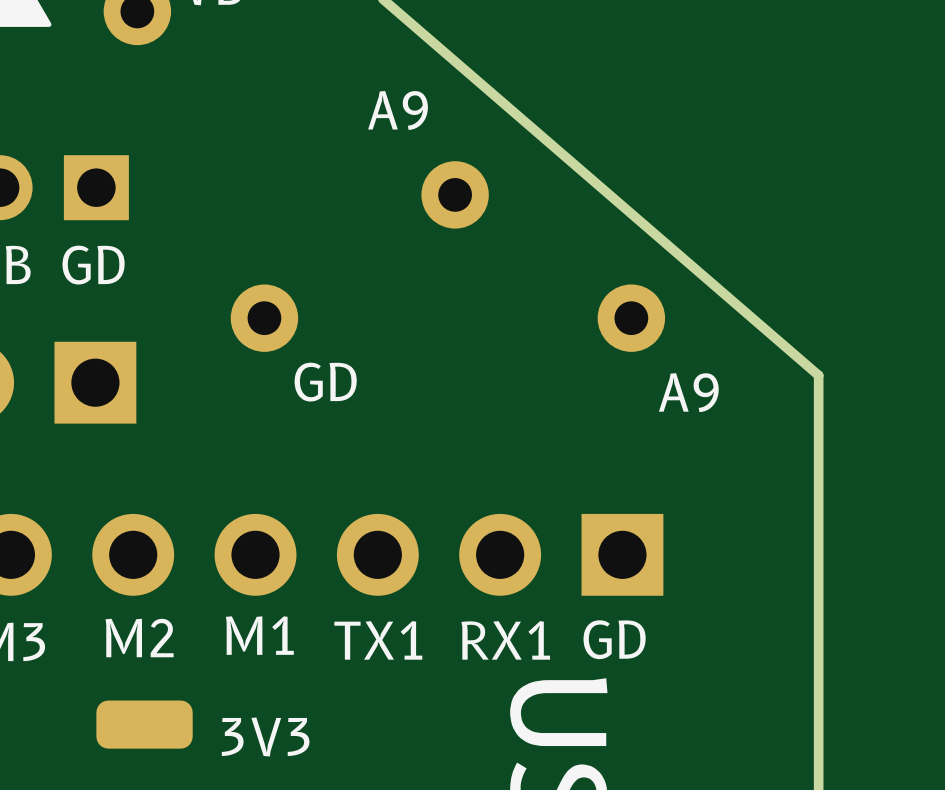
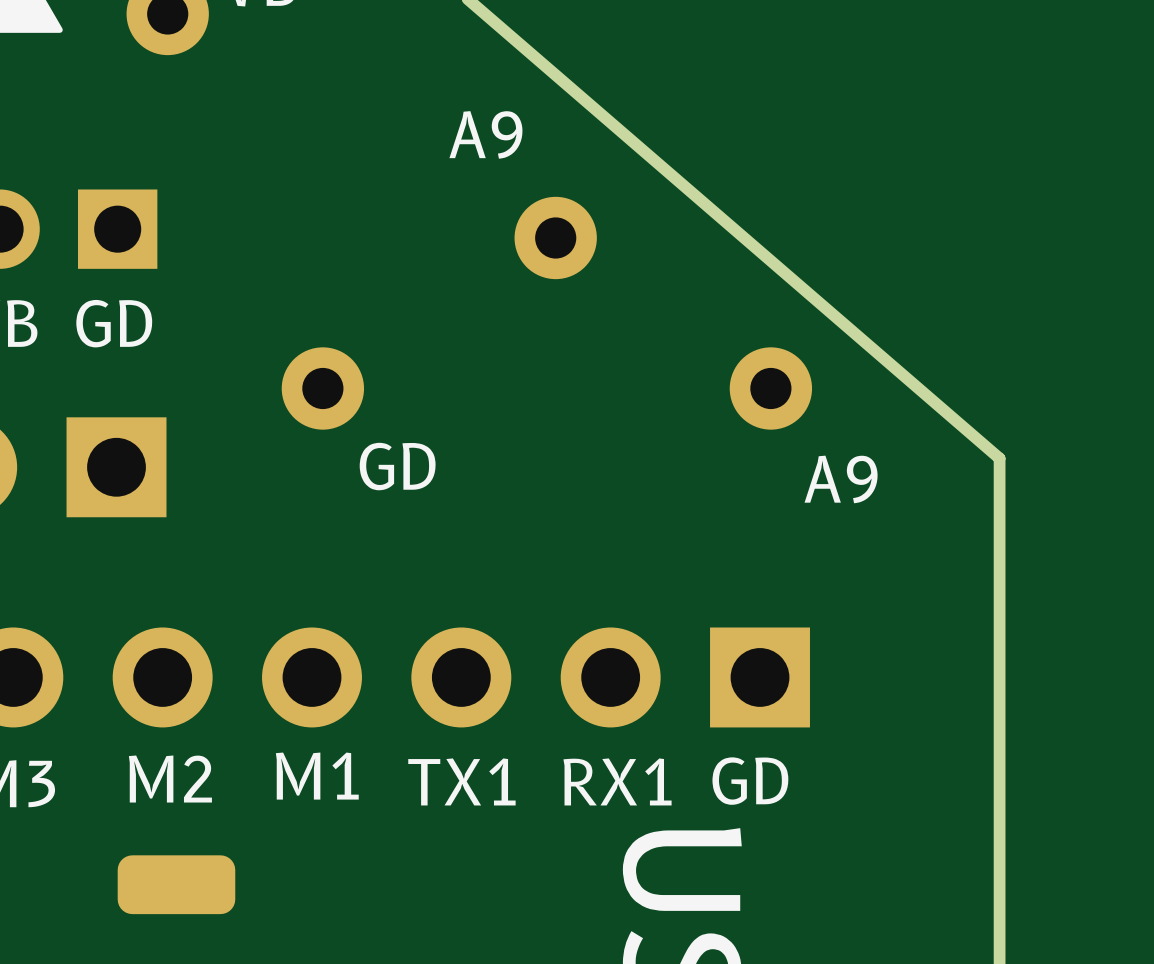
text: 3V3 (265, 736) -> none

